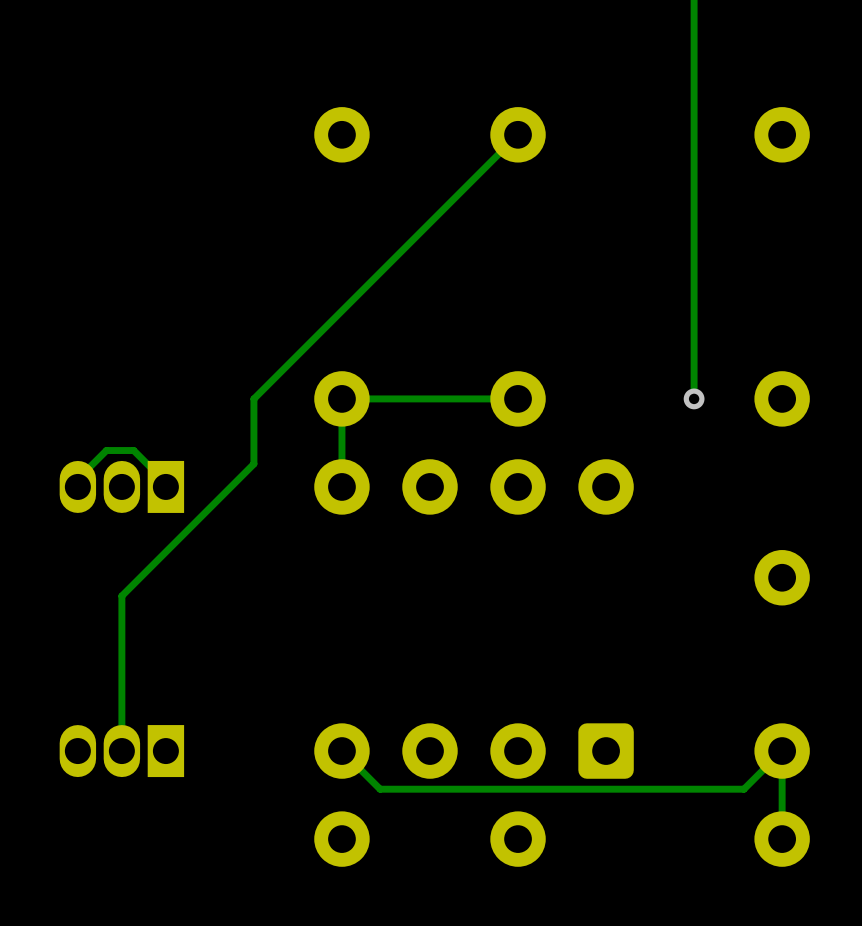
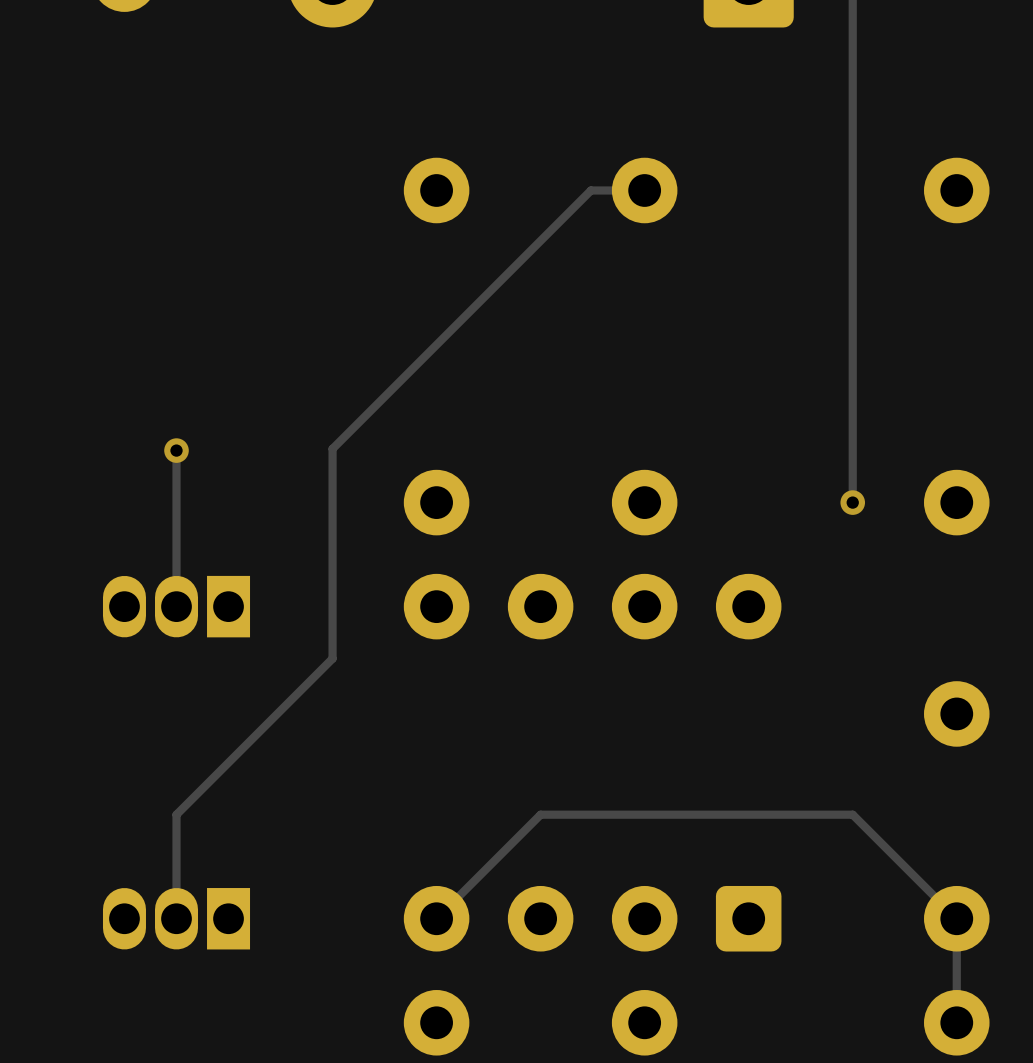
track: (518, 134) (253, 398) -> (644, 190) (590, 190) (332, 448) (332, 502)
track: none -> (176, 450) (176, 606)
via: none -> (176, 450)
track: (518, 398) (341, 398) (341, 486) -> none
track: (253, 463) (121, 596) (121, 663) -> (332, 579) (332, 658) (176, 814)
track: (165, 486) (165, 482) (133, 450) (106, 450) (77, 479) (77, 486) -> none
track: (782, 751) (743, 789) (380, 789) (341, 751) -> (956, 918) (852, 814) (540, 814) (436, 918)

